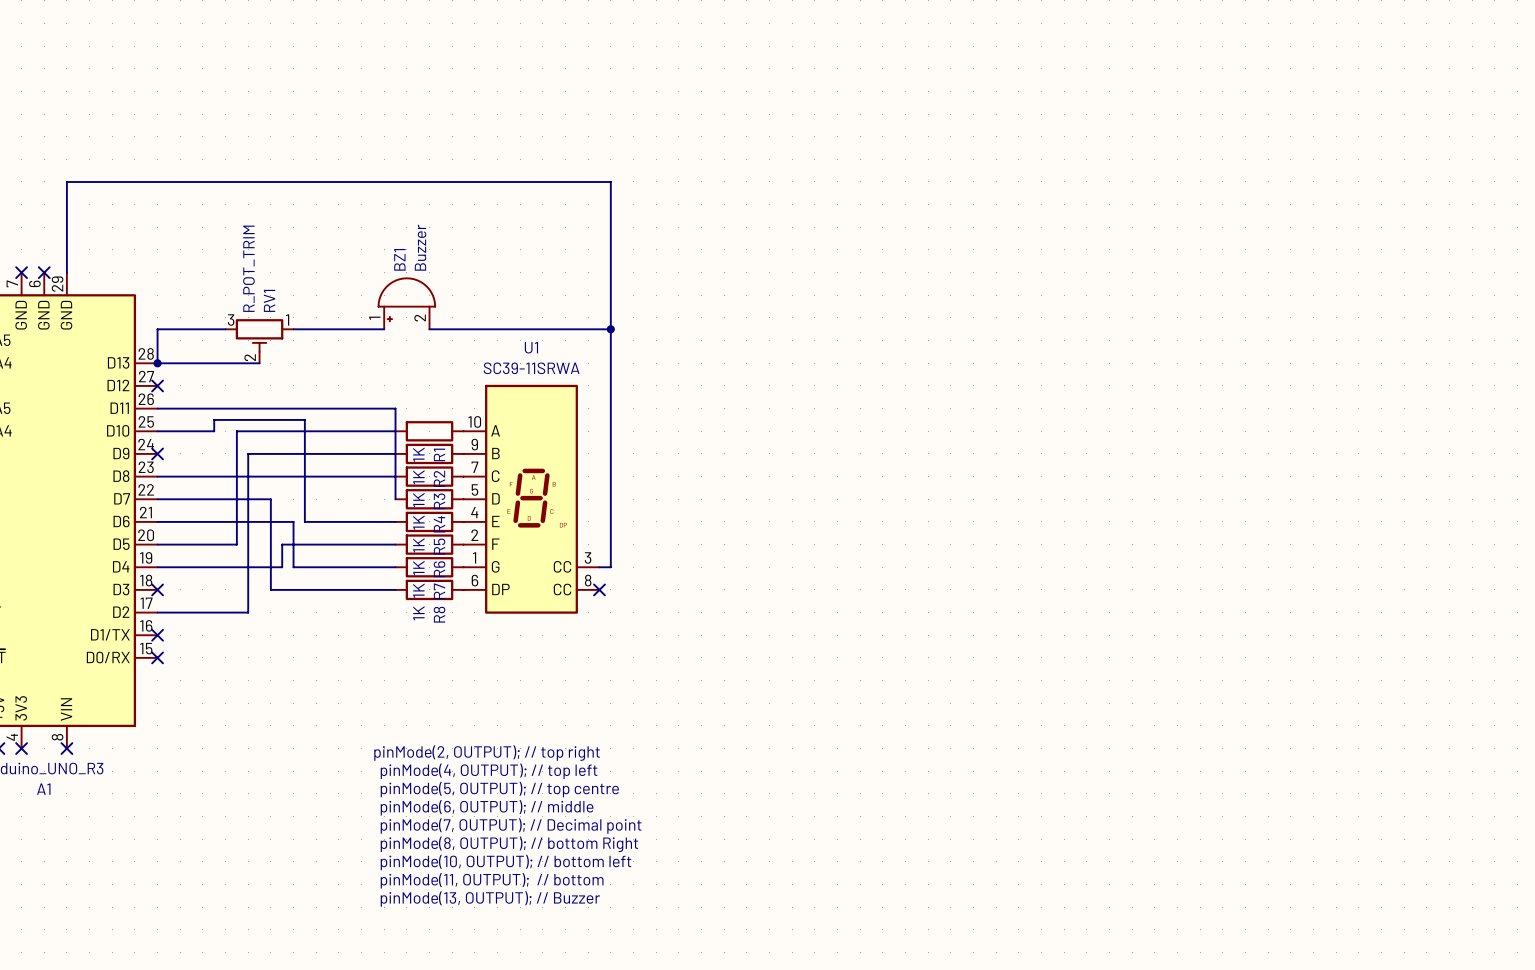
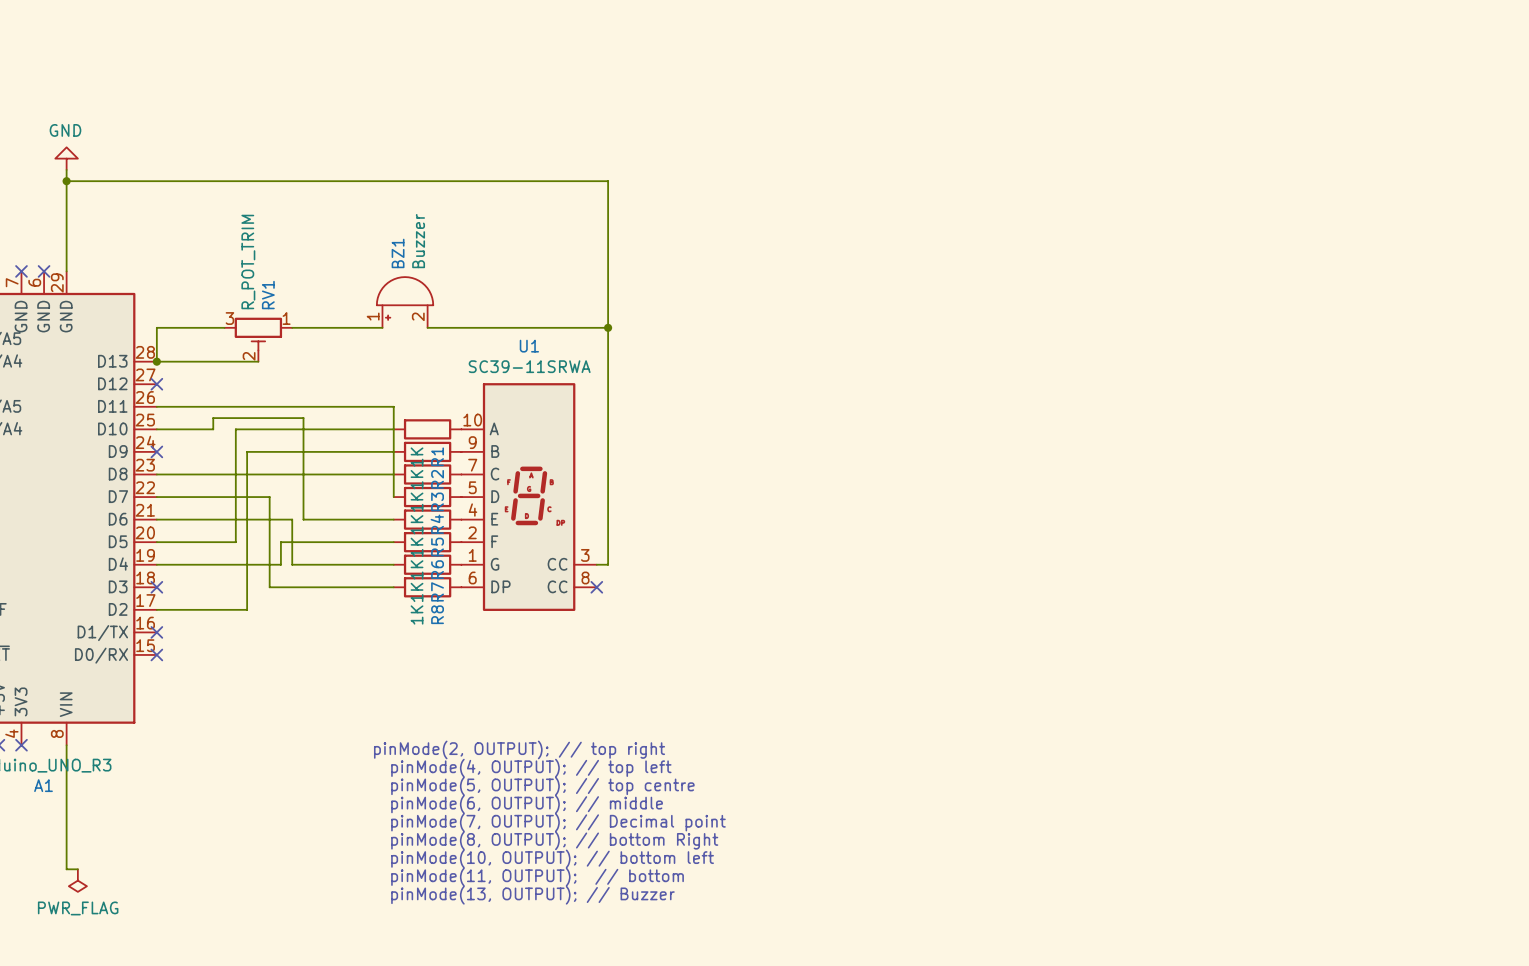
power symbol: none -> GND (66, 158)
wire: none -> (66, 169) (66, 181)
junction: none -> (66, 181)
wire: none -> (66, 745) (66, 869) (77, 869)
no-connect mark: (66, 748) -> none
power symbol: none -> PWR_FLAG (77, 880)

